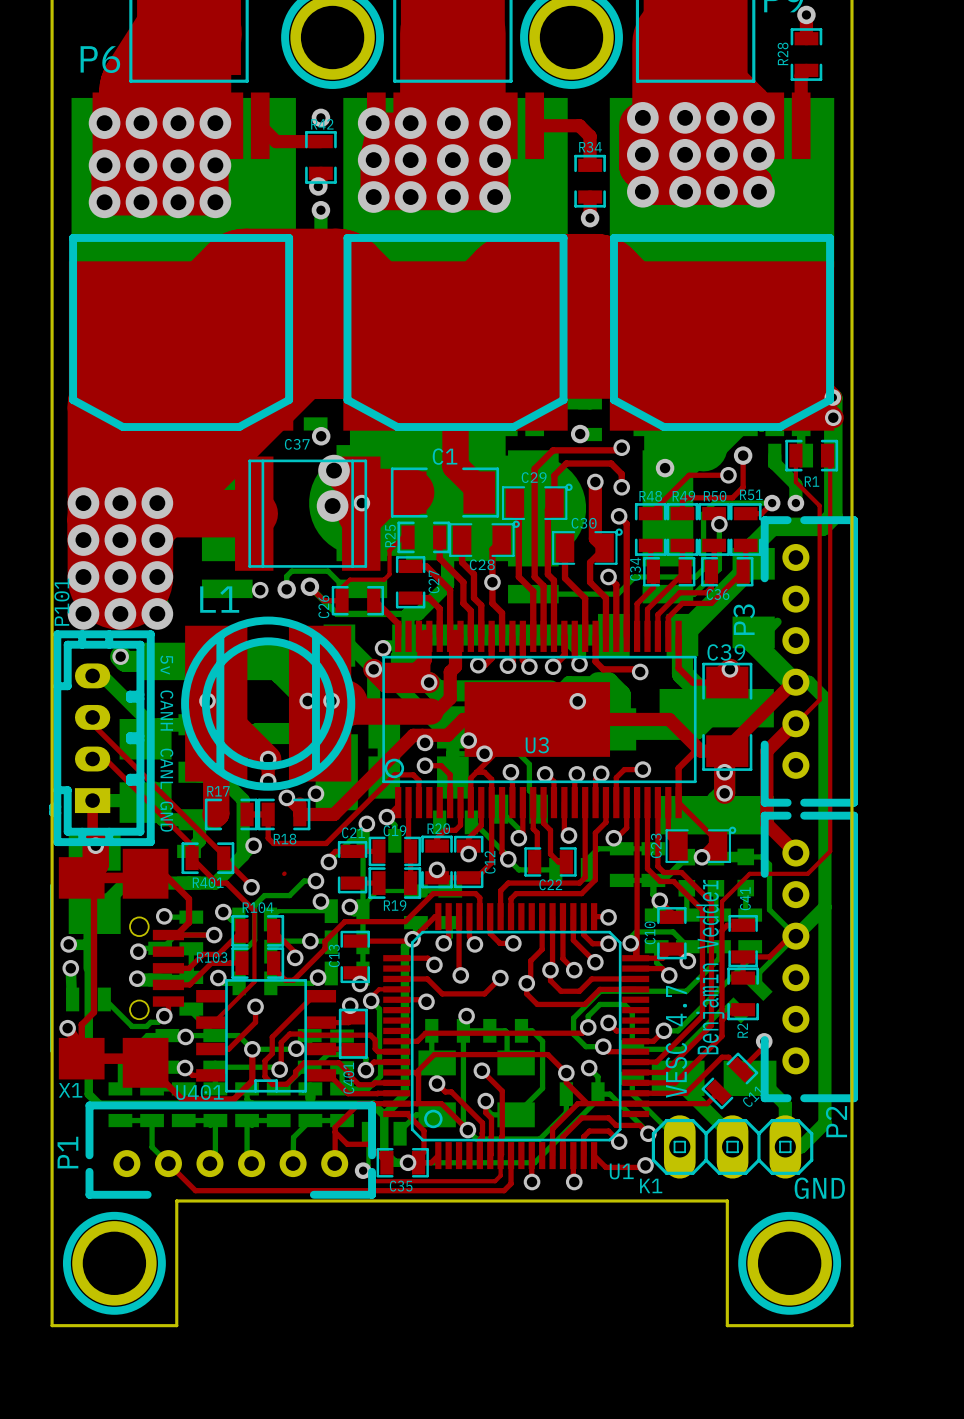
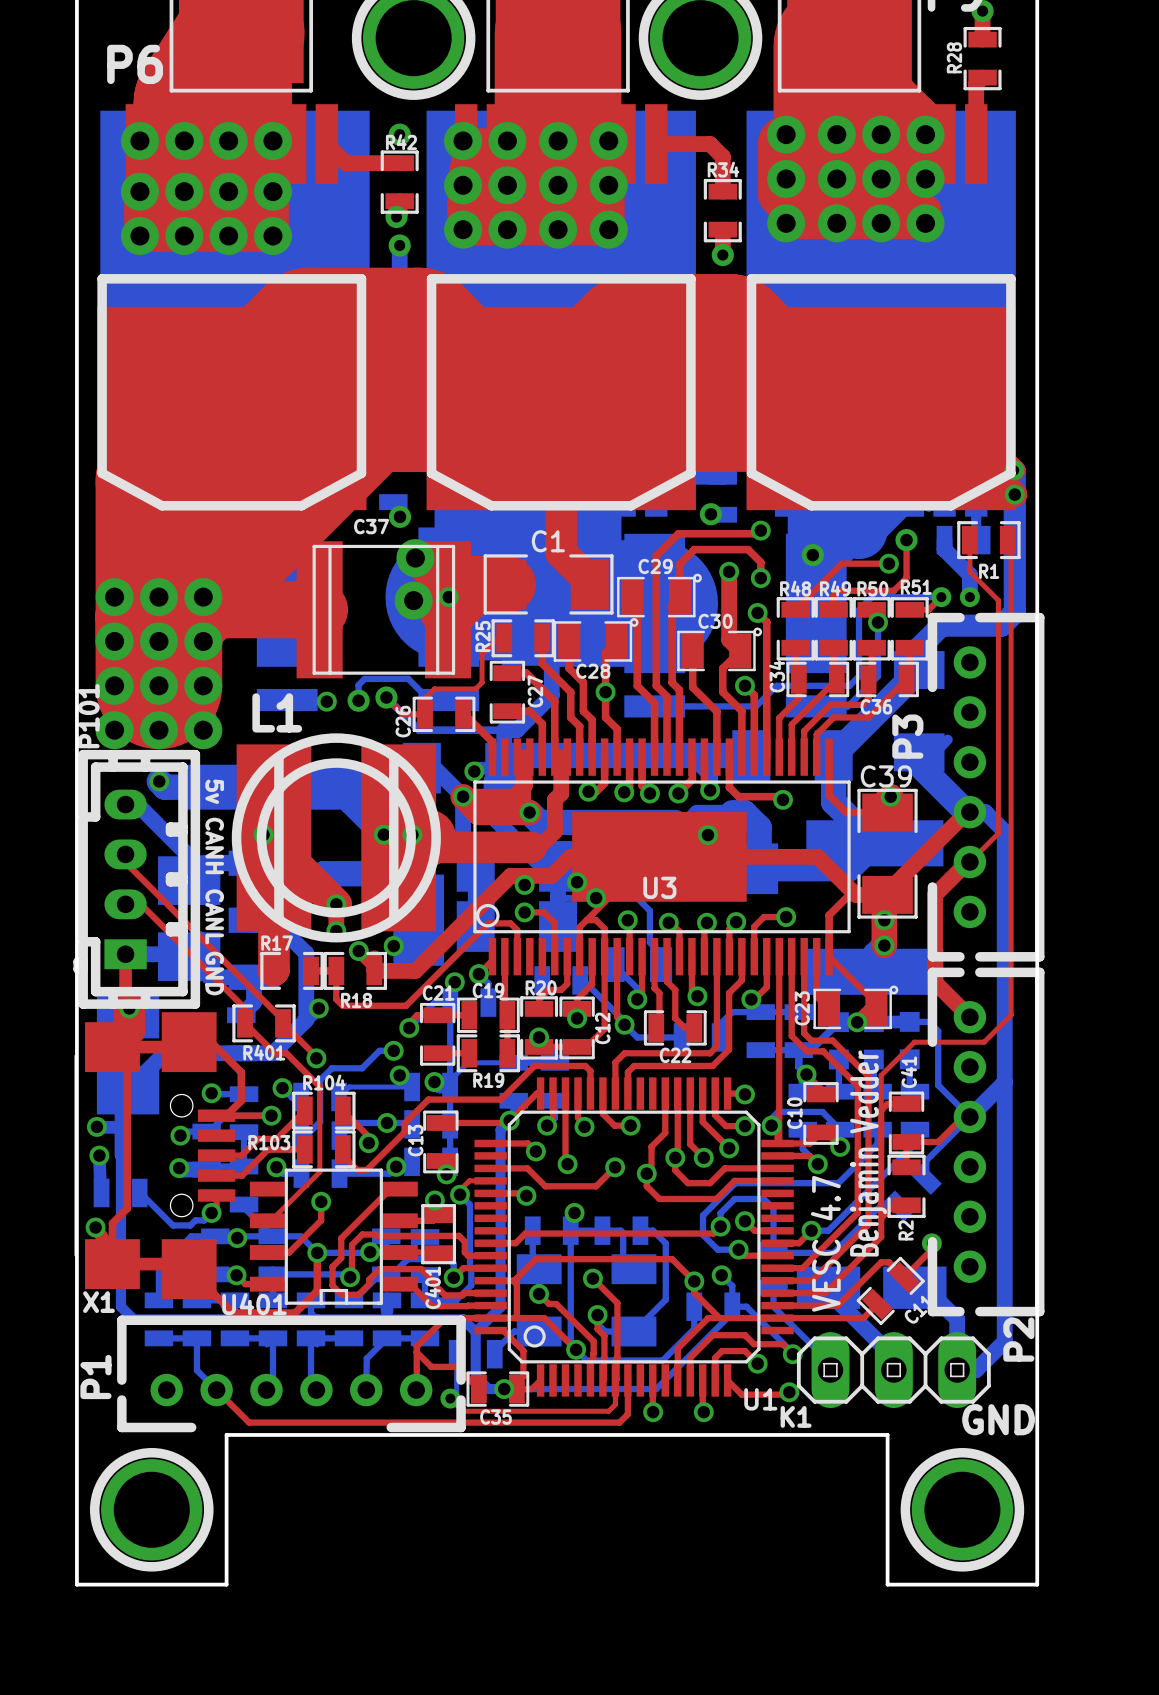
top track: (284, 873) (284, 873) -> none

